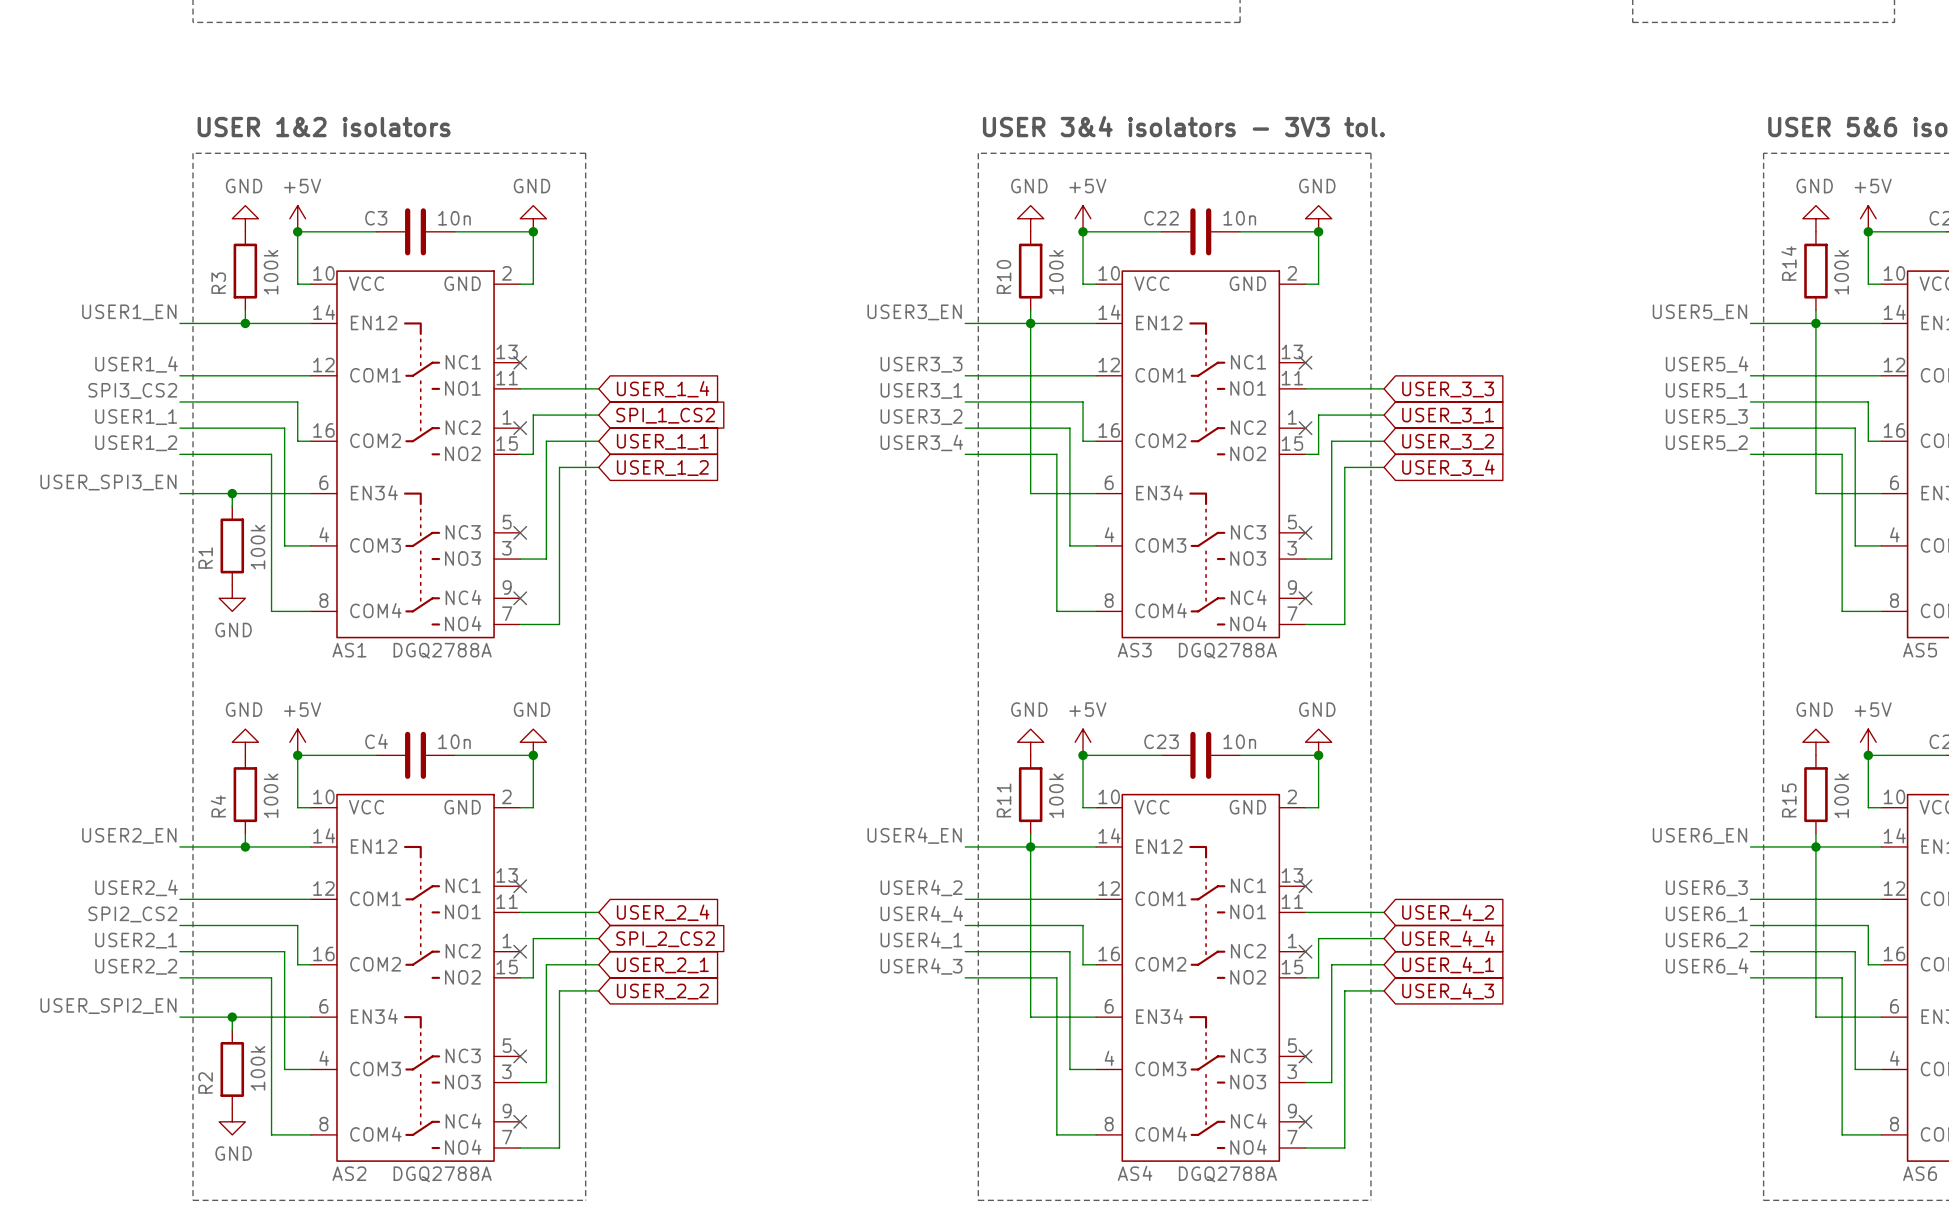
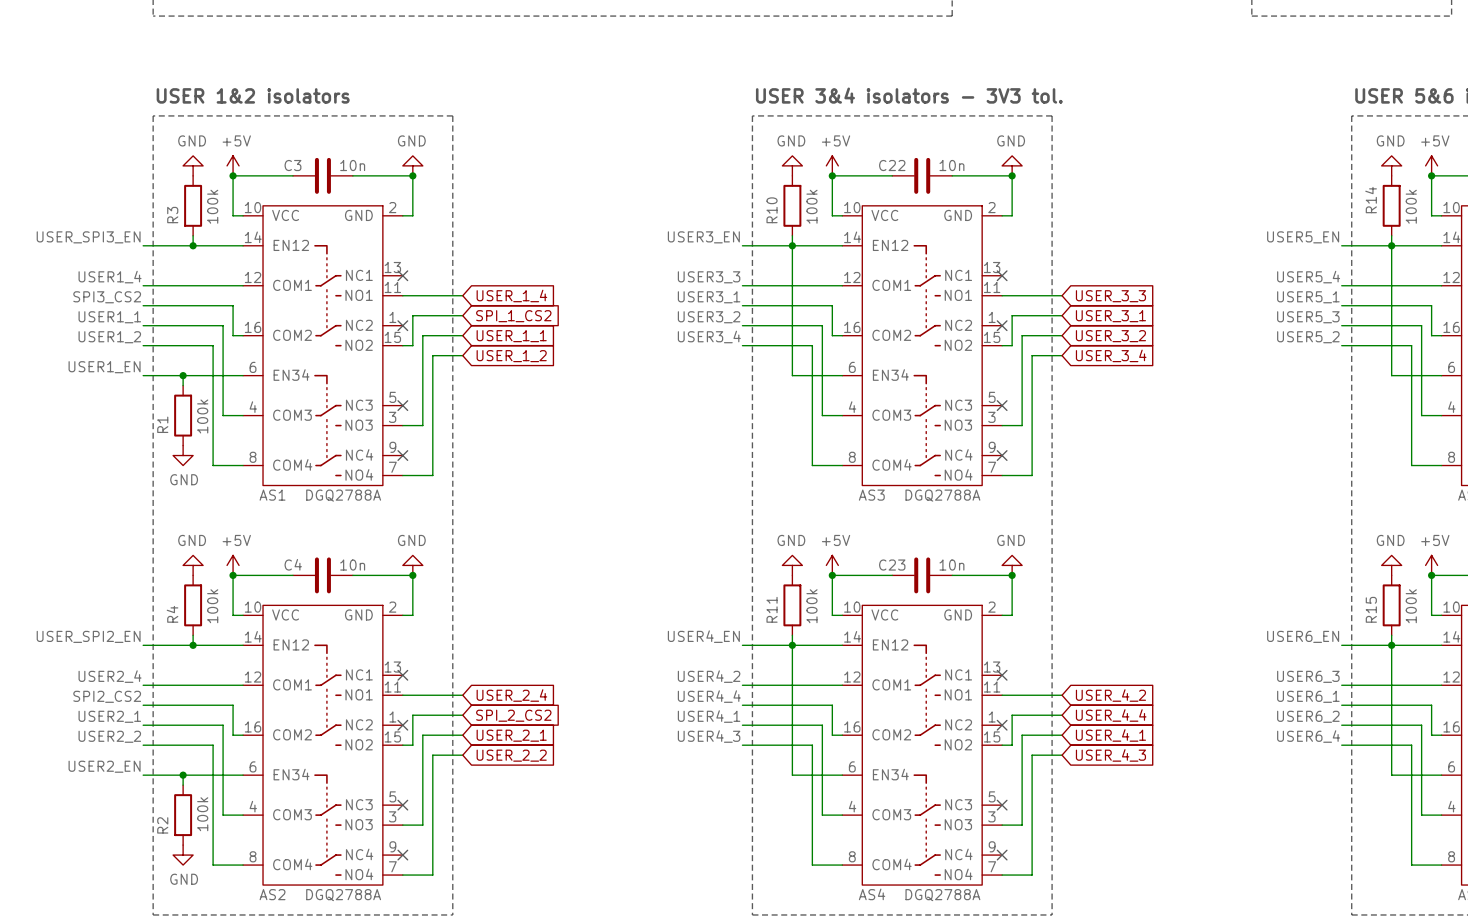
label: USER1_EN (129, 312) -> USER_SPI3_EN (88, 237)
label: USER_SPI3_EN (108, 482) -> USER1_EN (104, 367)
label: USER2_EN (129, 835) -> USER_SPI2_EN (88, 636)
label: USER_SPI2_EN (108, 1006) -> USER2_EN (104, 766)

